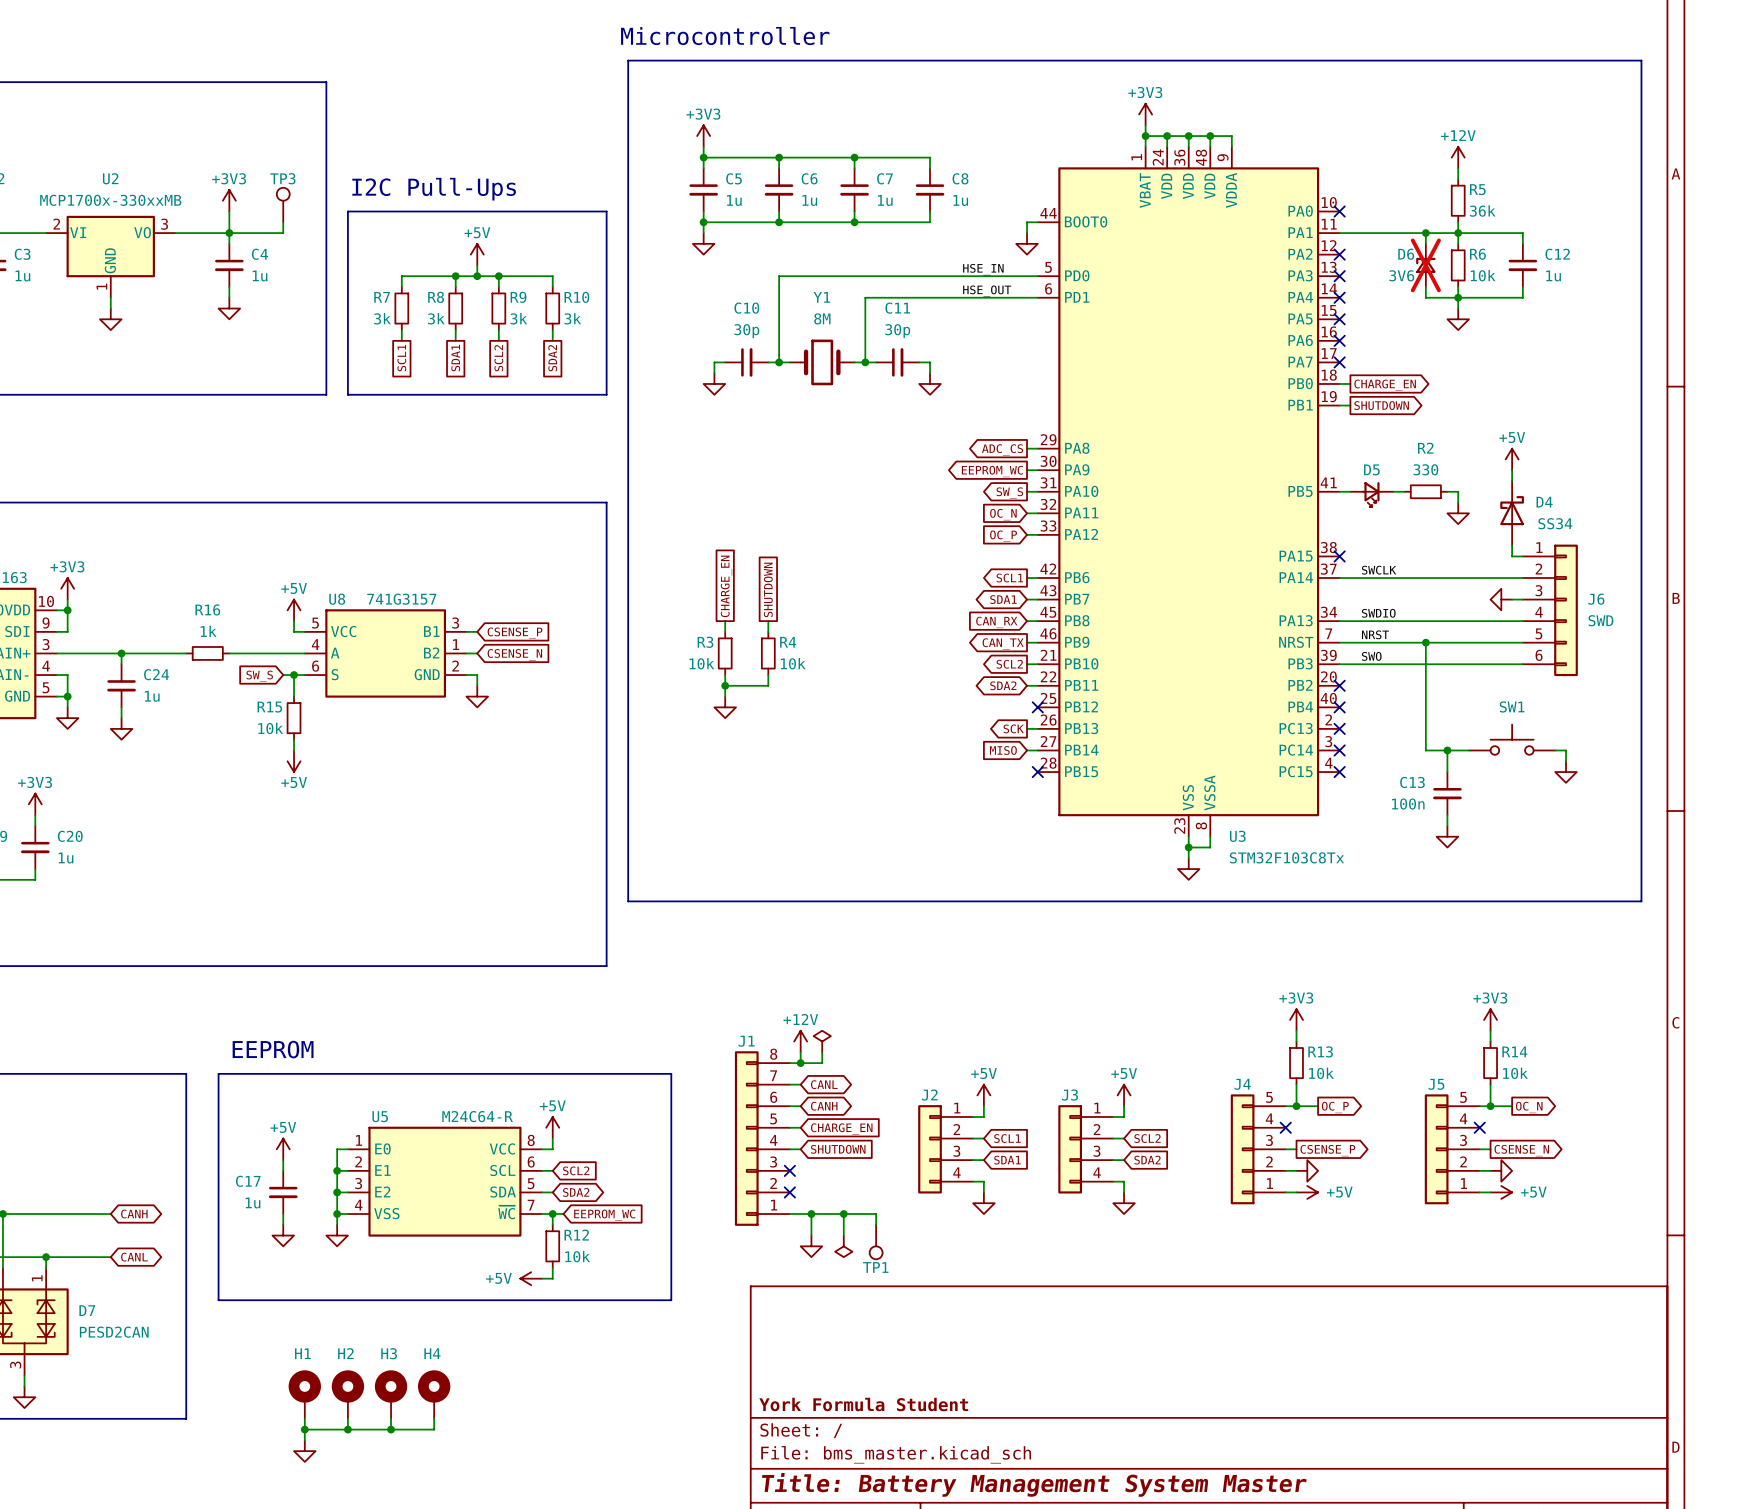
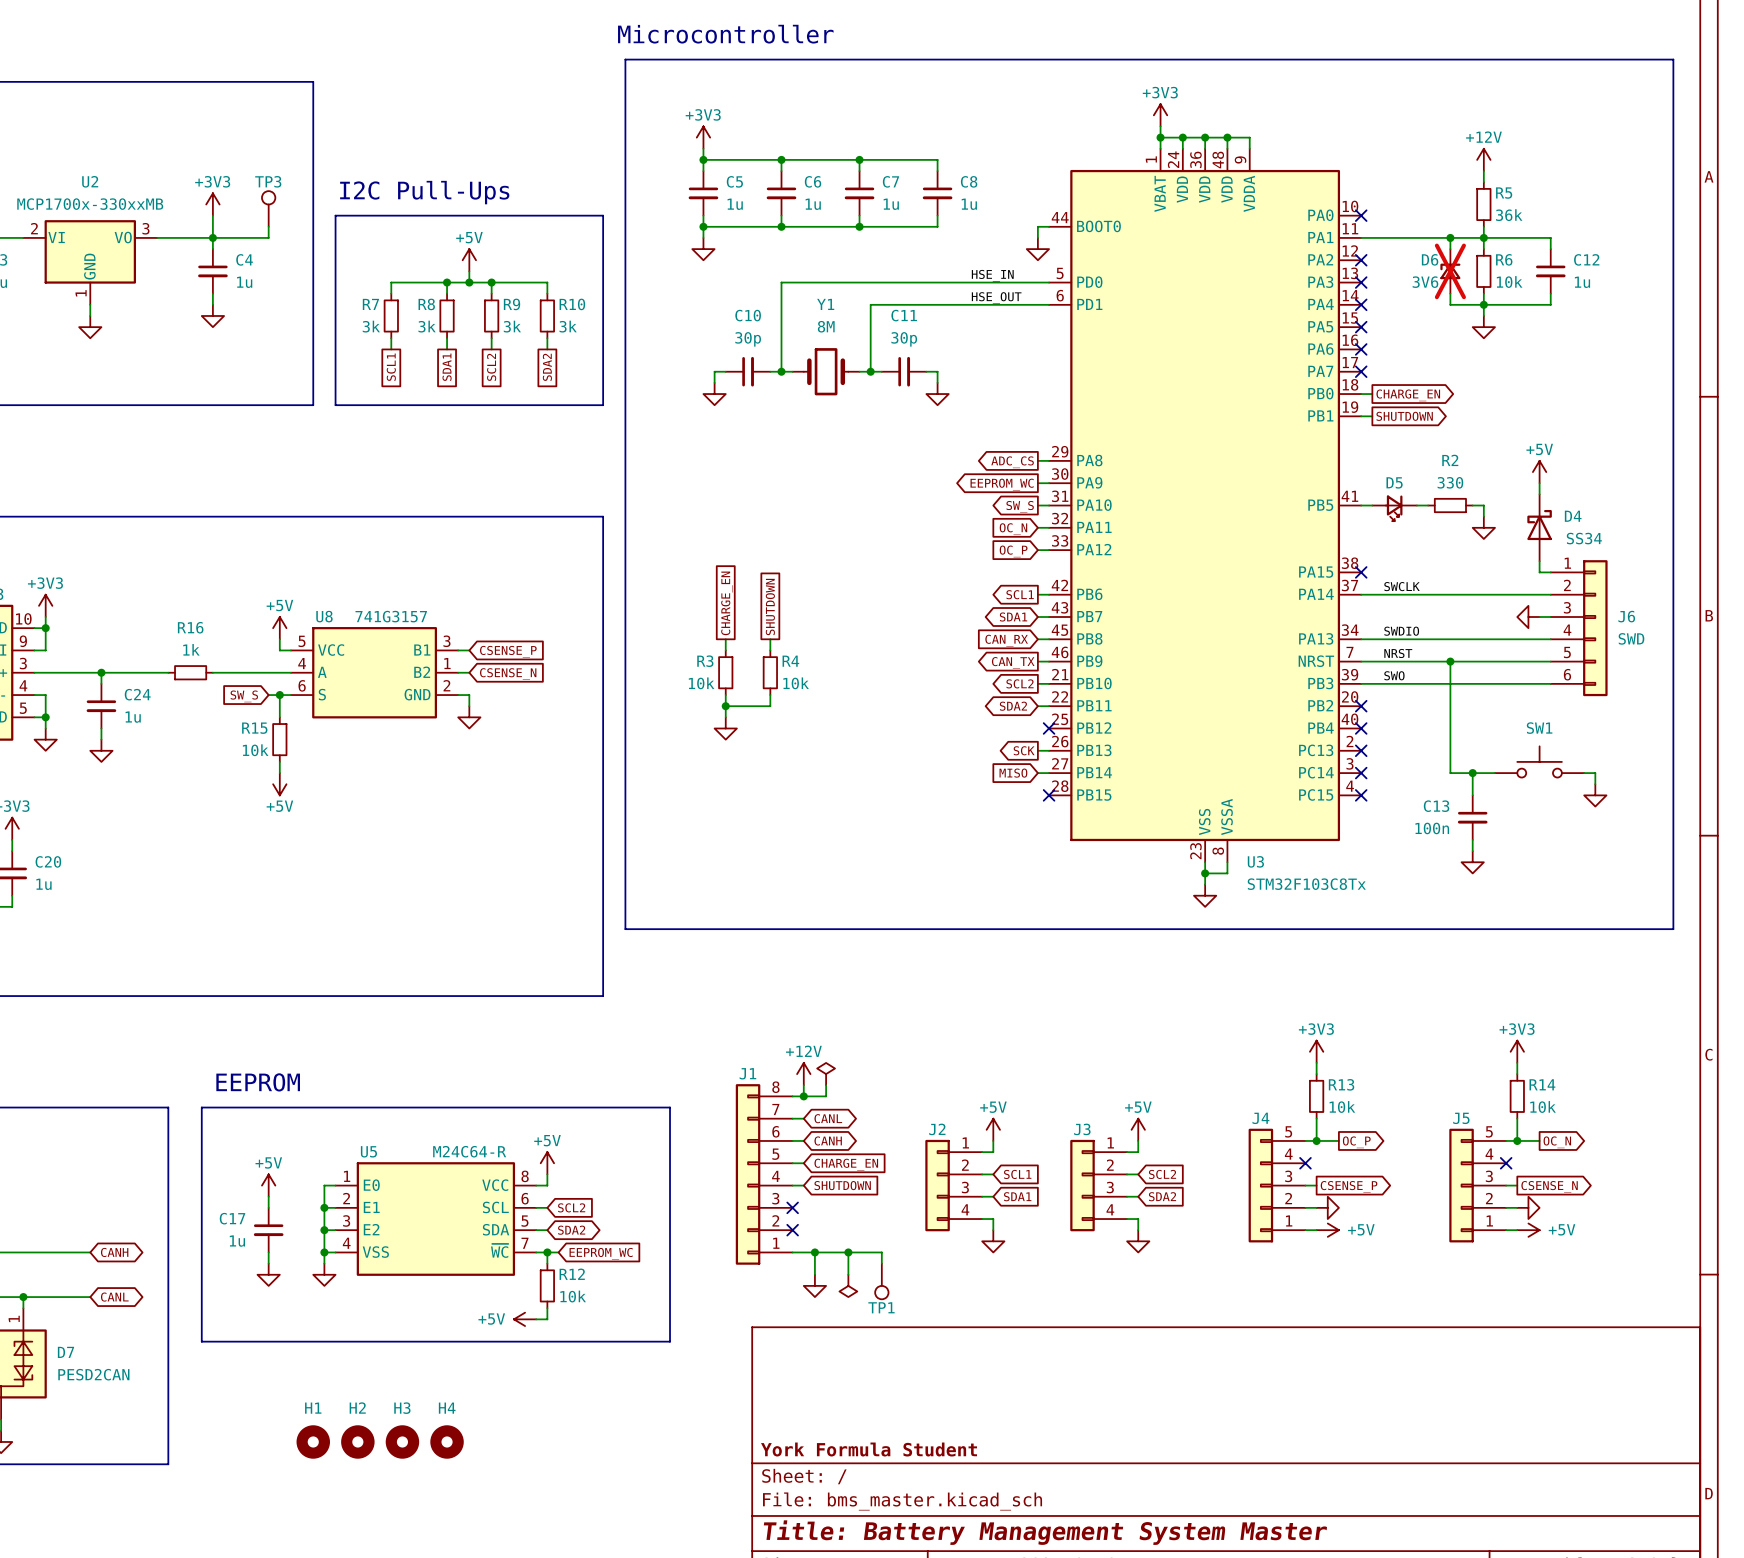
H1 symbol: [288, 1370, 321, 1419] -> [296, 1425, 330, 1459]
H2 symbol: [331, 1370, 365, 1419] -> [341, 1425, 375, 1459]
H3 symbol: [374, 1370, 408, 1419] -> [385, 1425, 420, 1459]
H4 symbol: [417, 1370, 451, 1419] -> [430, 1425, 464, 1459]
wire: (304, 1418) (304, 1440) -> none
wire: (347, 1418) (347, 1429) -> none
wire: (391, 1418) (391, 1429) -> none
wire: (434, 1418) (434, 1429) (304, 1429) -> none
junction: (304, 1429) -> none
junction: (347, 1429) -> none
junction: (391, 1429) -> none
power symbol: (304, 1451) -> none

